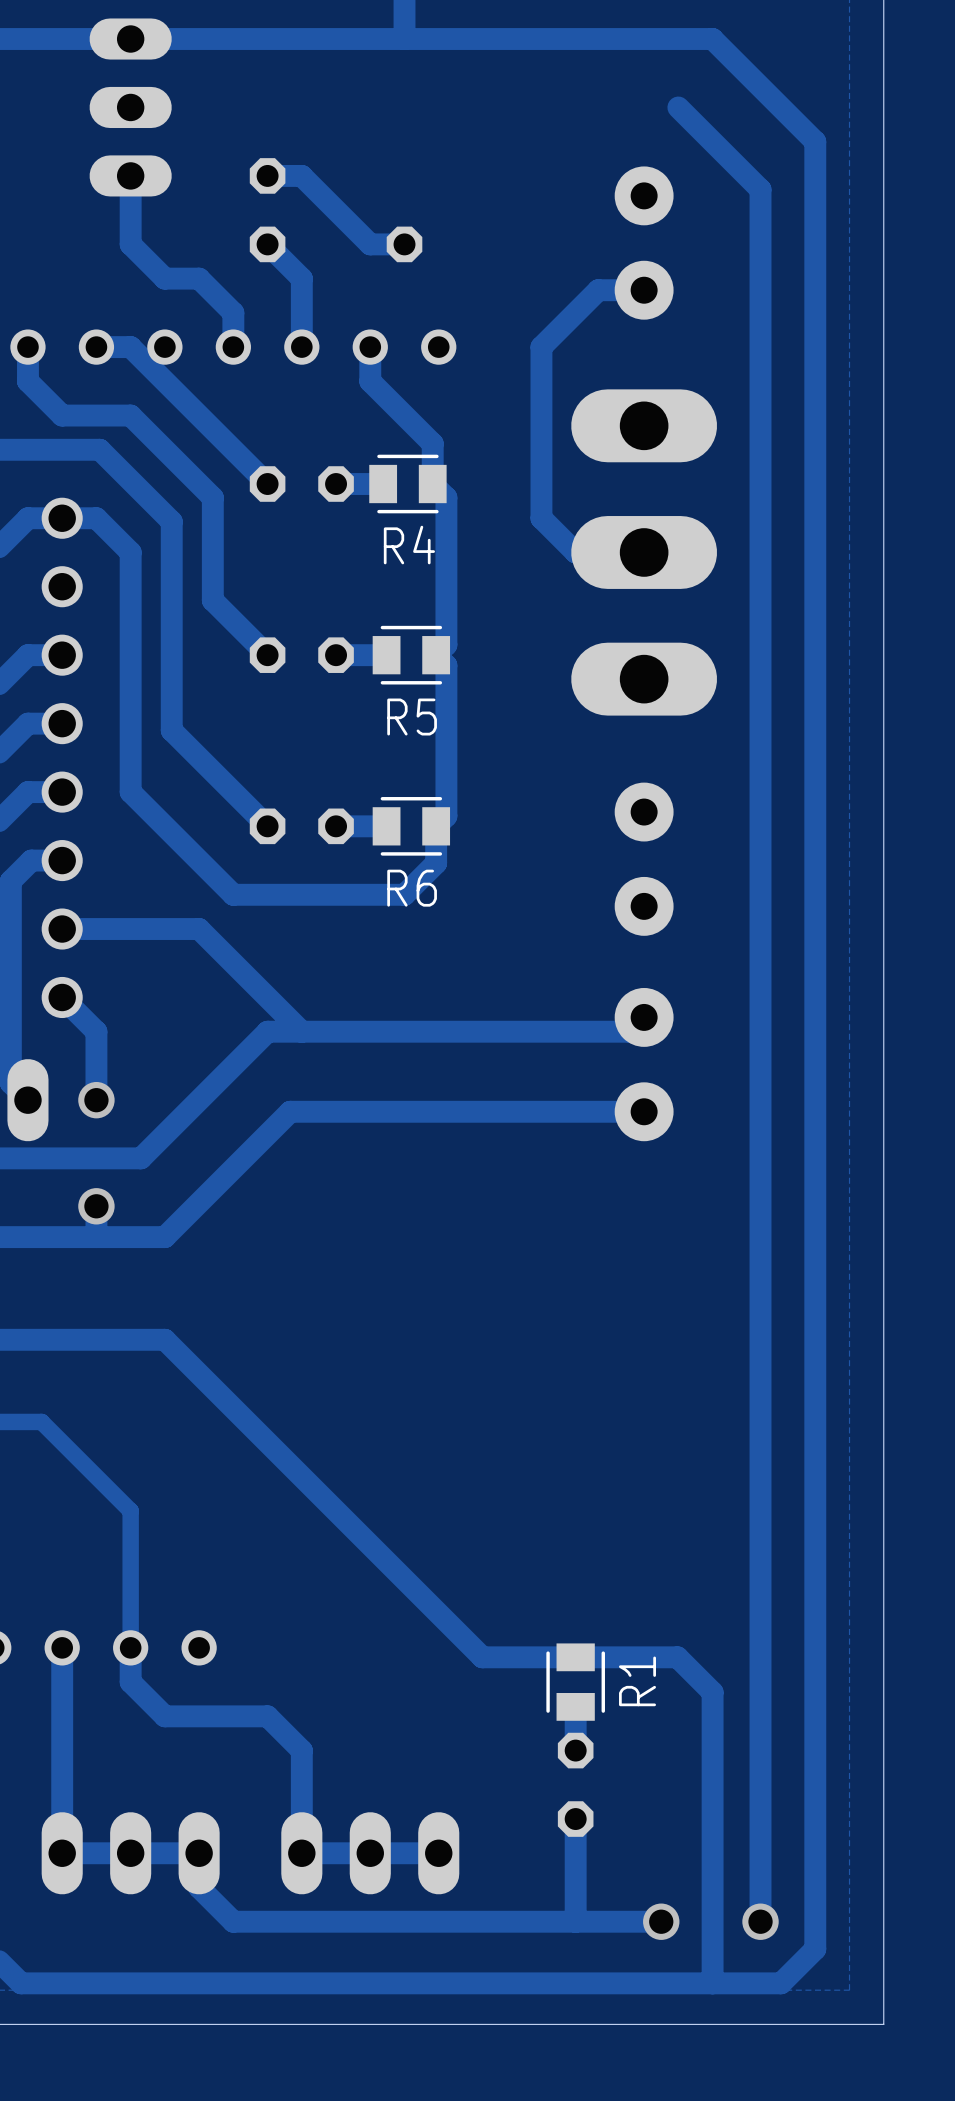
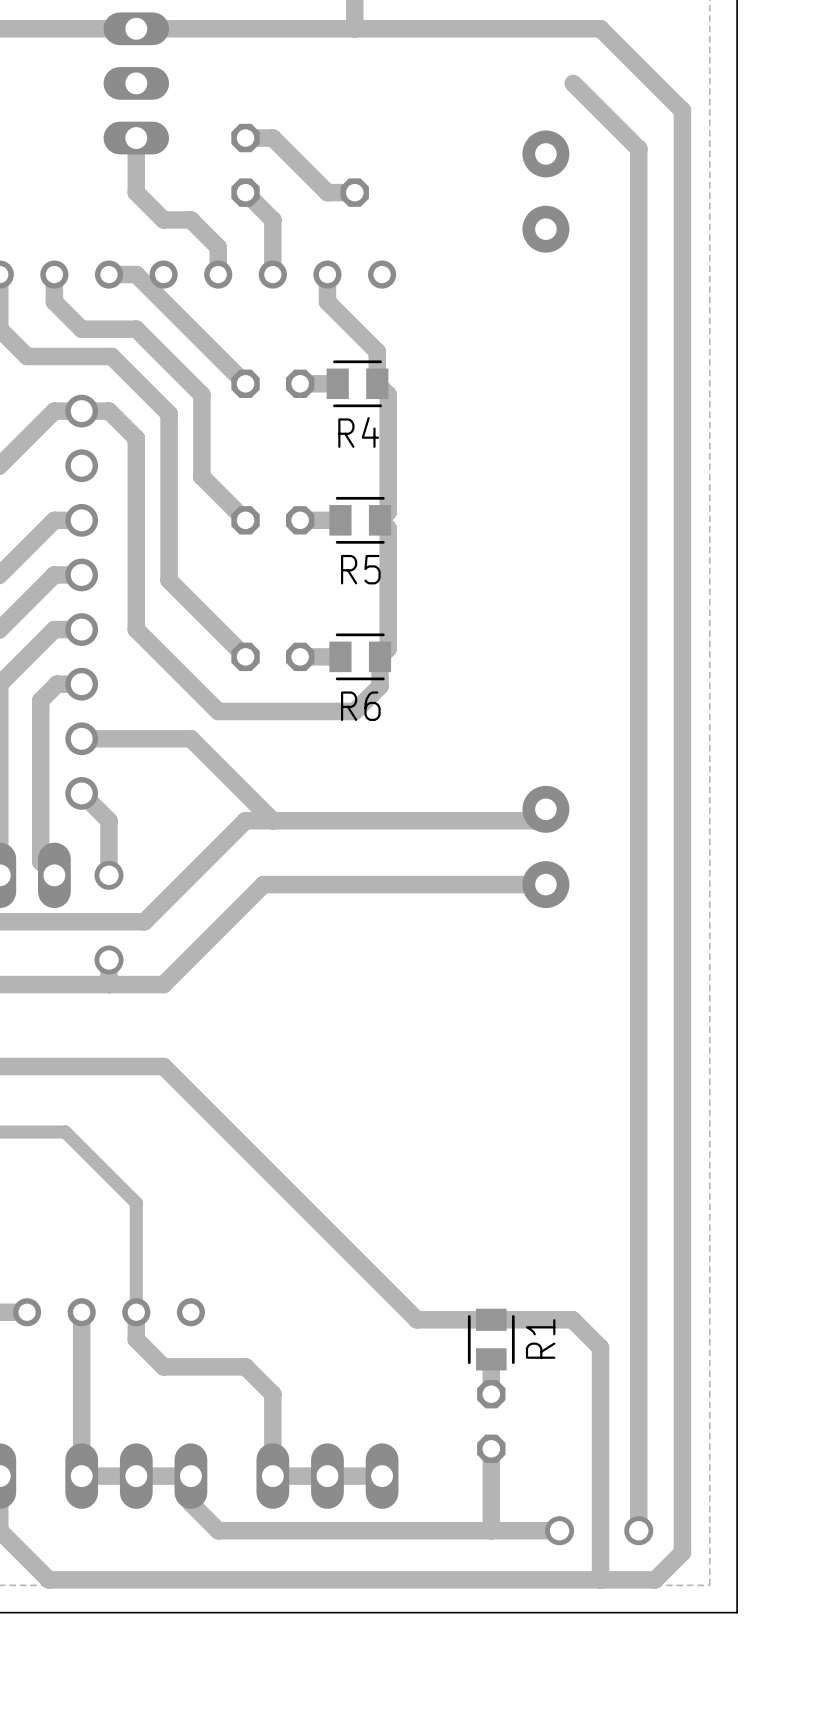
track: (644, 290) (598, 290) (541, 347) (541, 518) (575, 552) (644, 552) -> none
part: (644, 552) -> none
part: (644, 859) -> none

